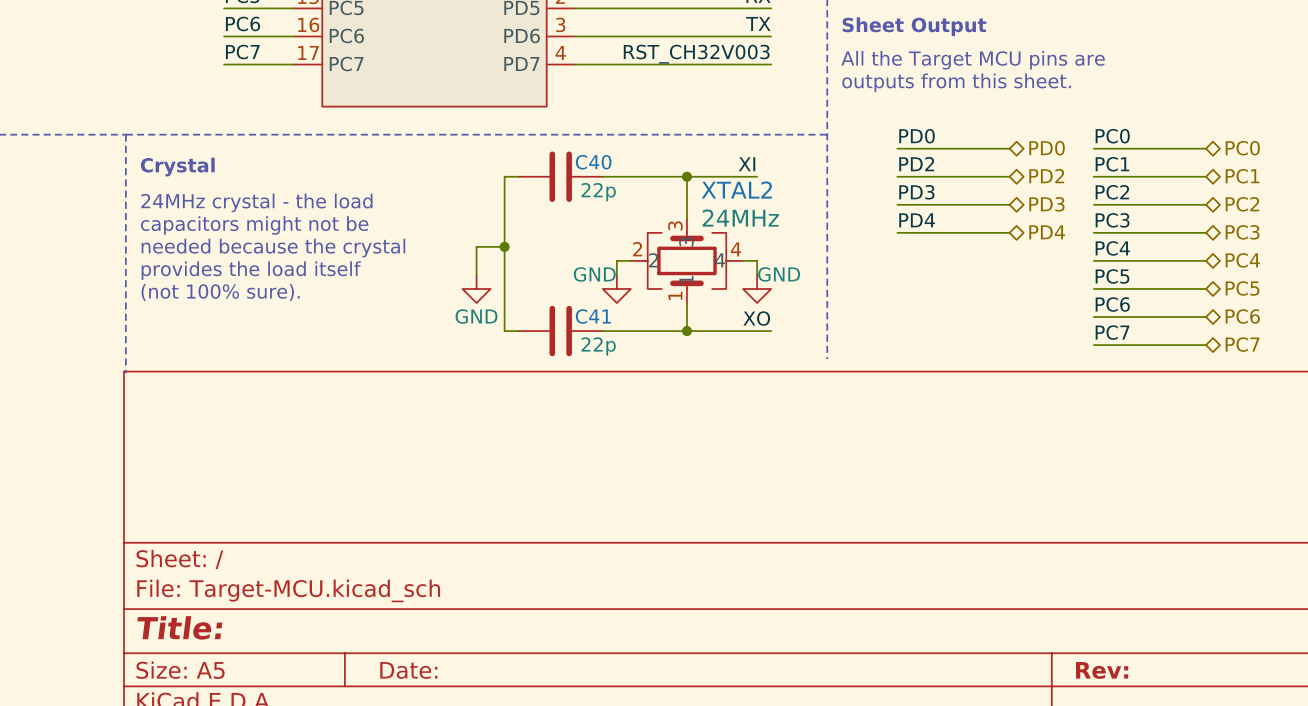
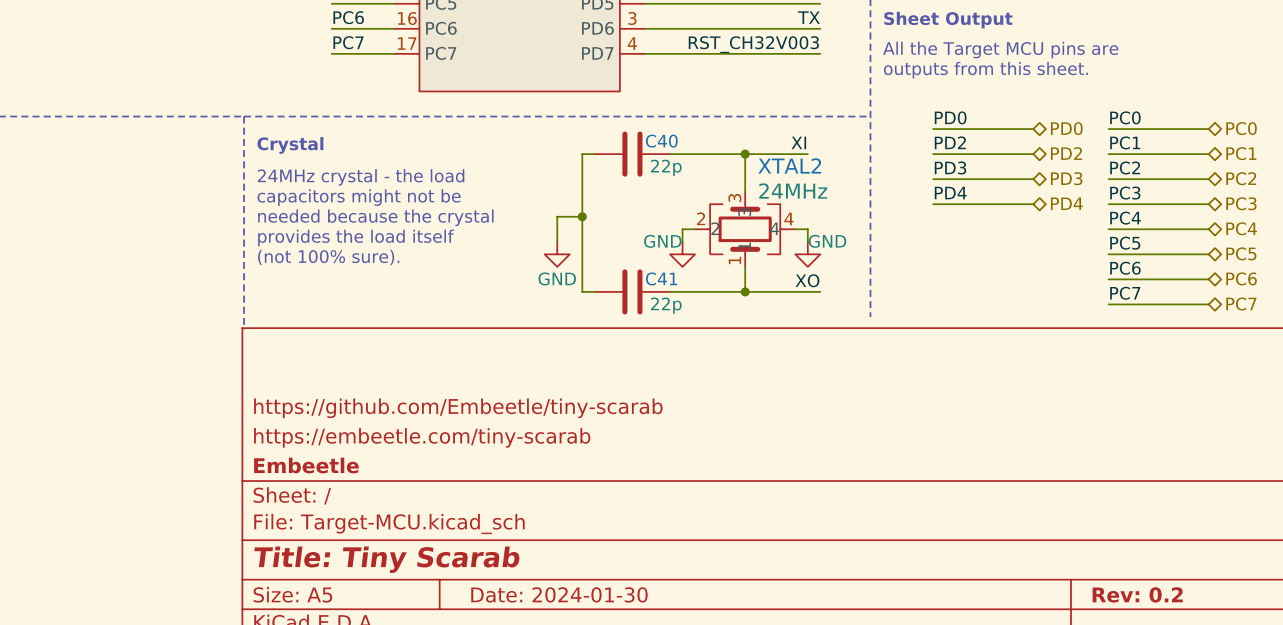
title block: none -> https://github.com/Embeetle/tiny-scarab (458, 408)
title block: none -> https://embeetle.com/tiny-scarab (422, 437)
title block: none -> Embeetle (306, 465)
title block: Title: (179, 627) -> Title: Tiny Scarab (387, 559)
title block: Date: (408, 670) -> Date: 2024-01-30 (559, 594)
title block: Rev: (1102, 670) -> Rev: 0.2 (1137, 594)

